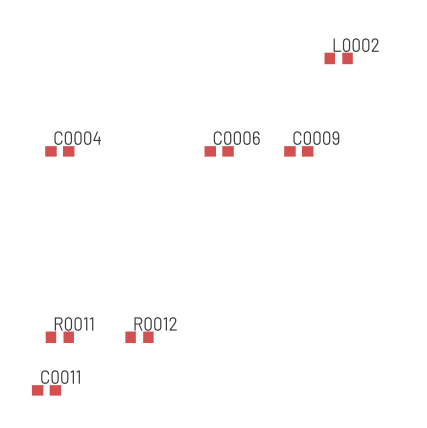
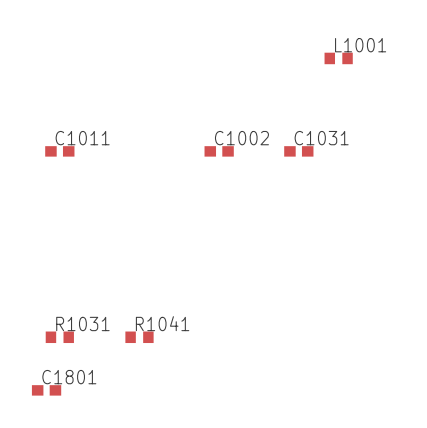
L0002 name: L0002 (356, 45) -> L1001 (360, 45)
C0004 name: C0004 (77, 138) -> C1011 (82, 138)
C0006 name: C0006 (236, 138) -> C1002 (241, 138)
C0009 name: C0009 (316, 138) -> C1031 (321, 138)
R0011 name: R0011 (74, 324) -> R1031 (82, 323)
R0012 name: R0012 (155, 324) -> R1041 (162, 323)
C0011 name: C0011 (60, 377) -> C1801 (69, 377)

